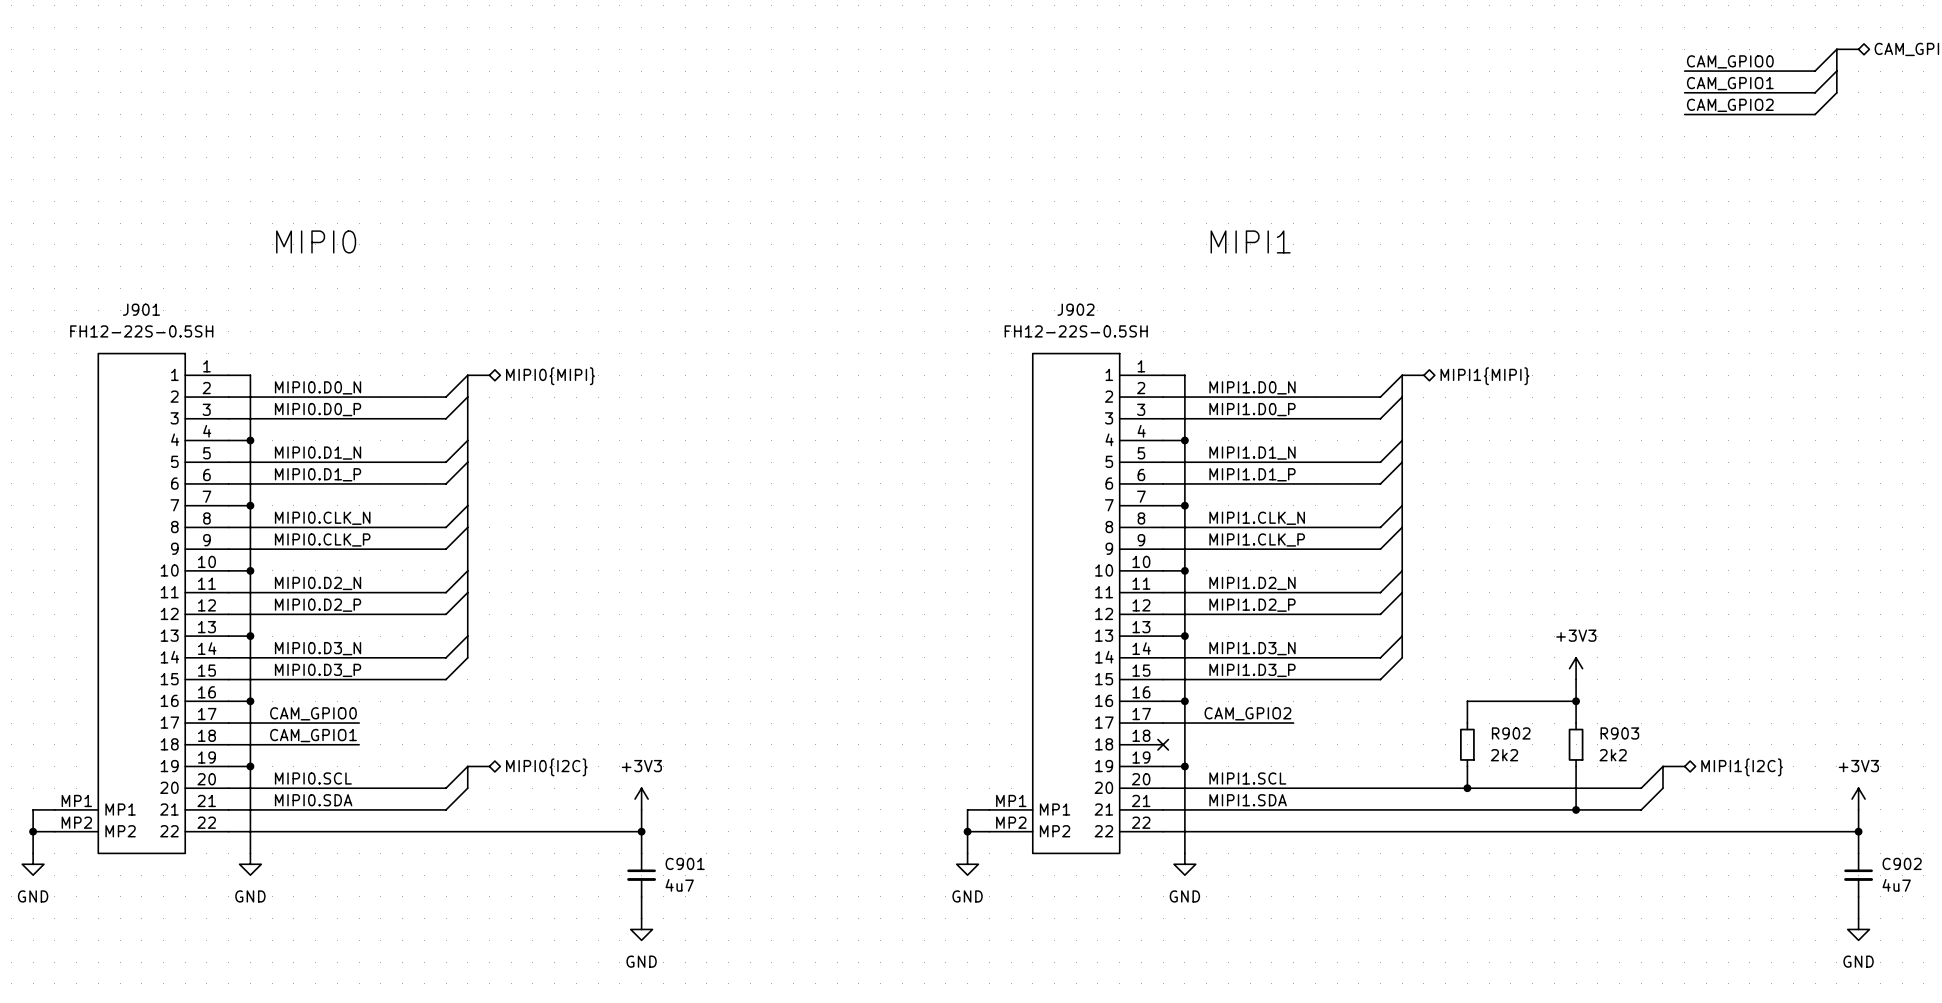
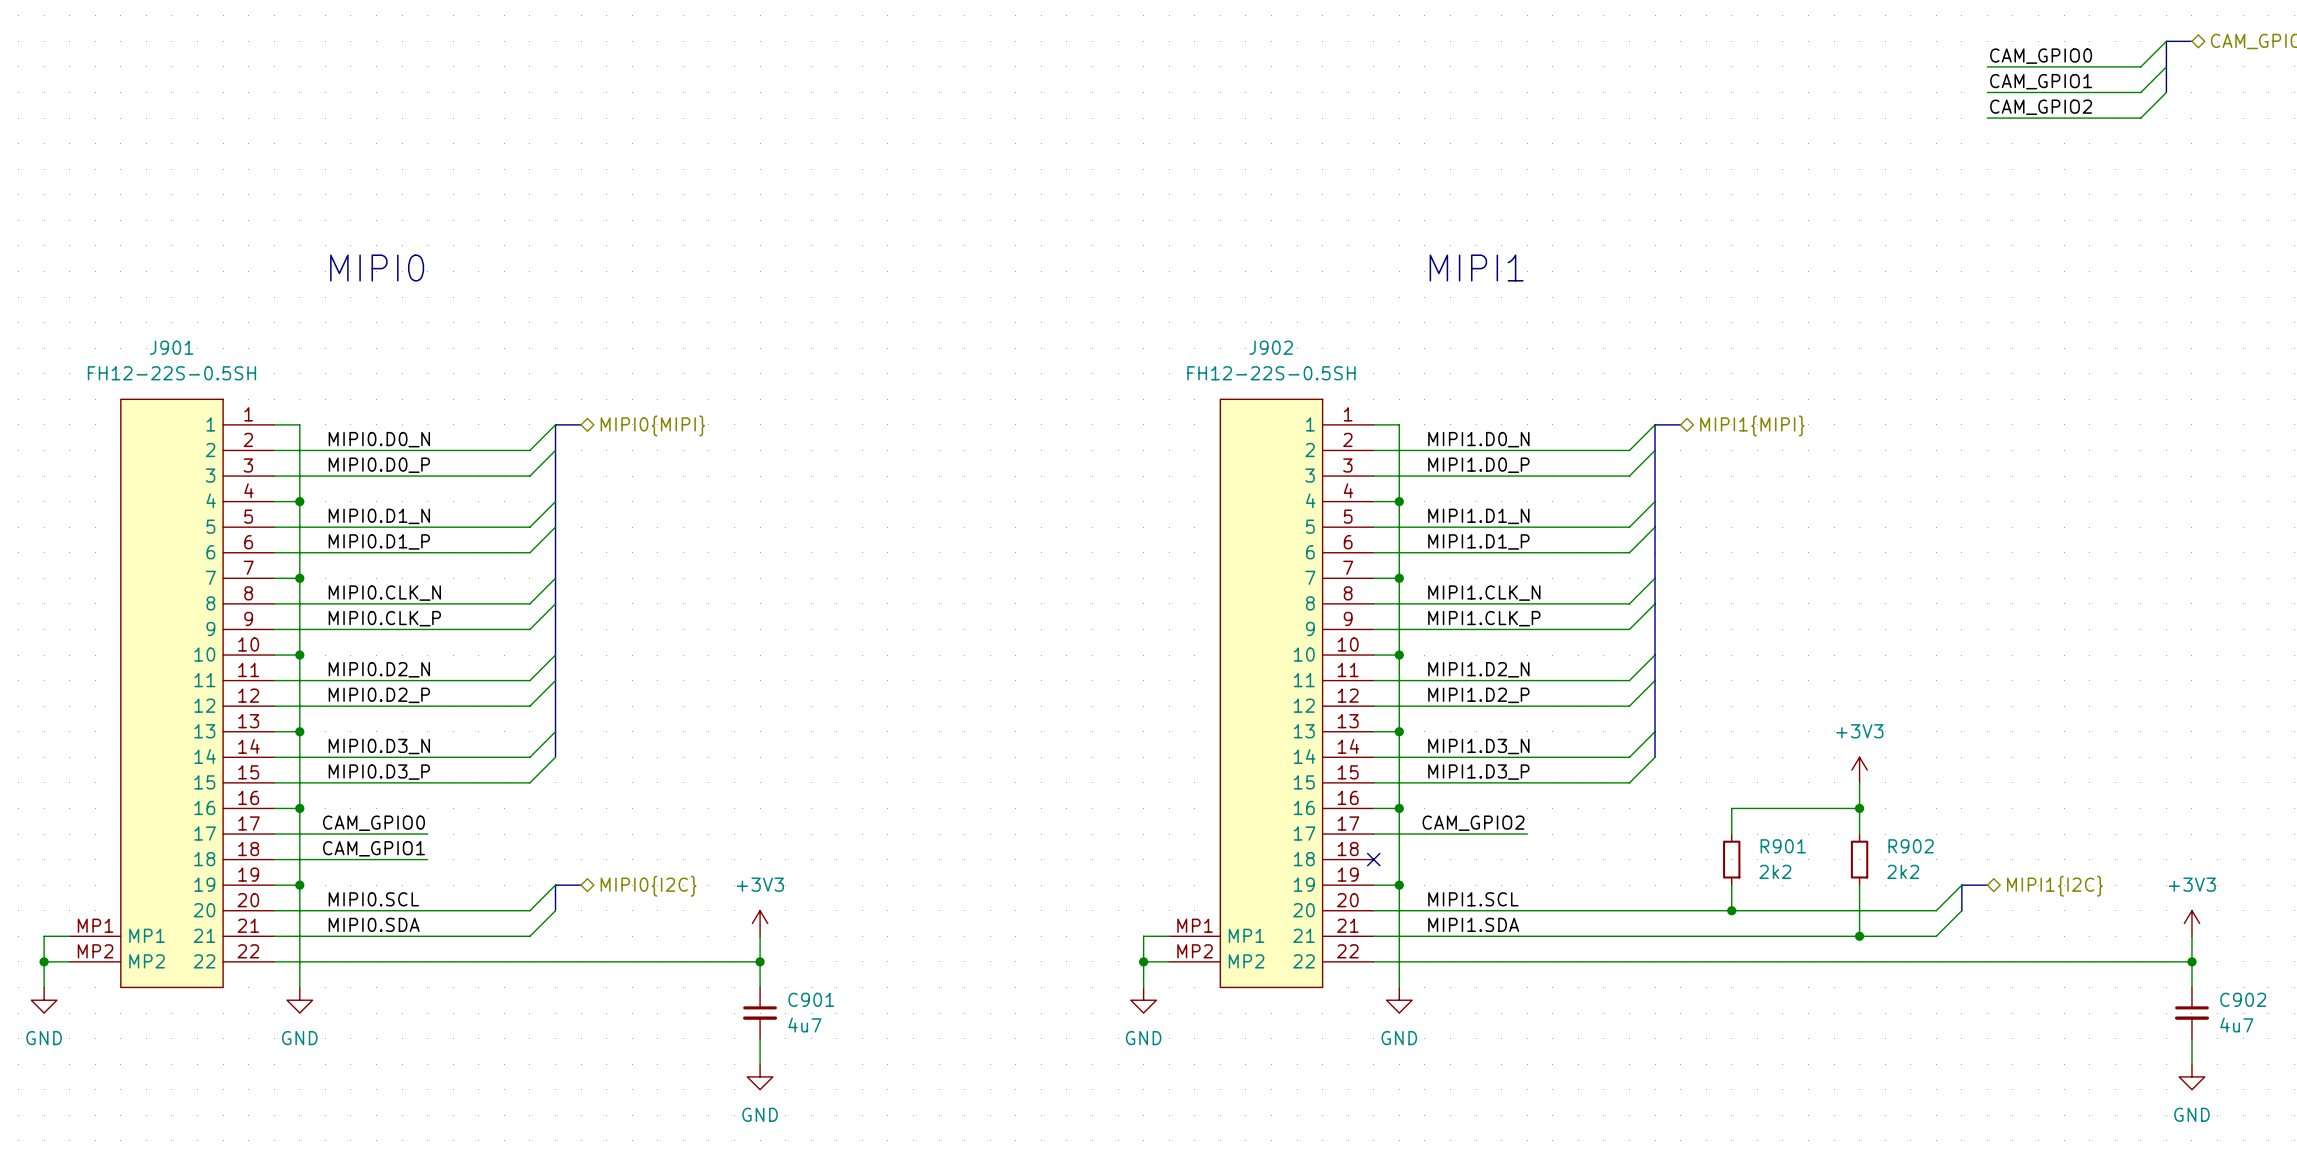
R902 name: R902 (1511, 733) -> R901 (1783, 846)
R903 name: R903 (1619, 733) -> R902 (1911, 846)

